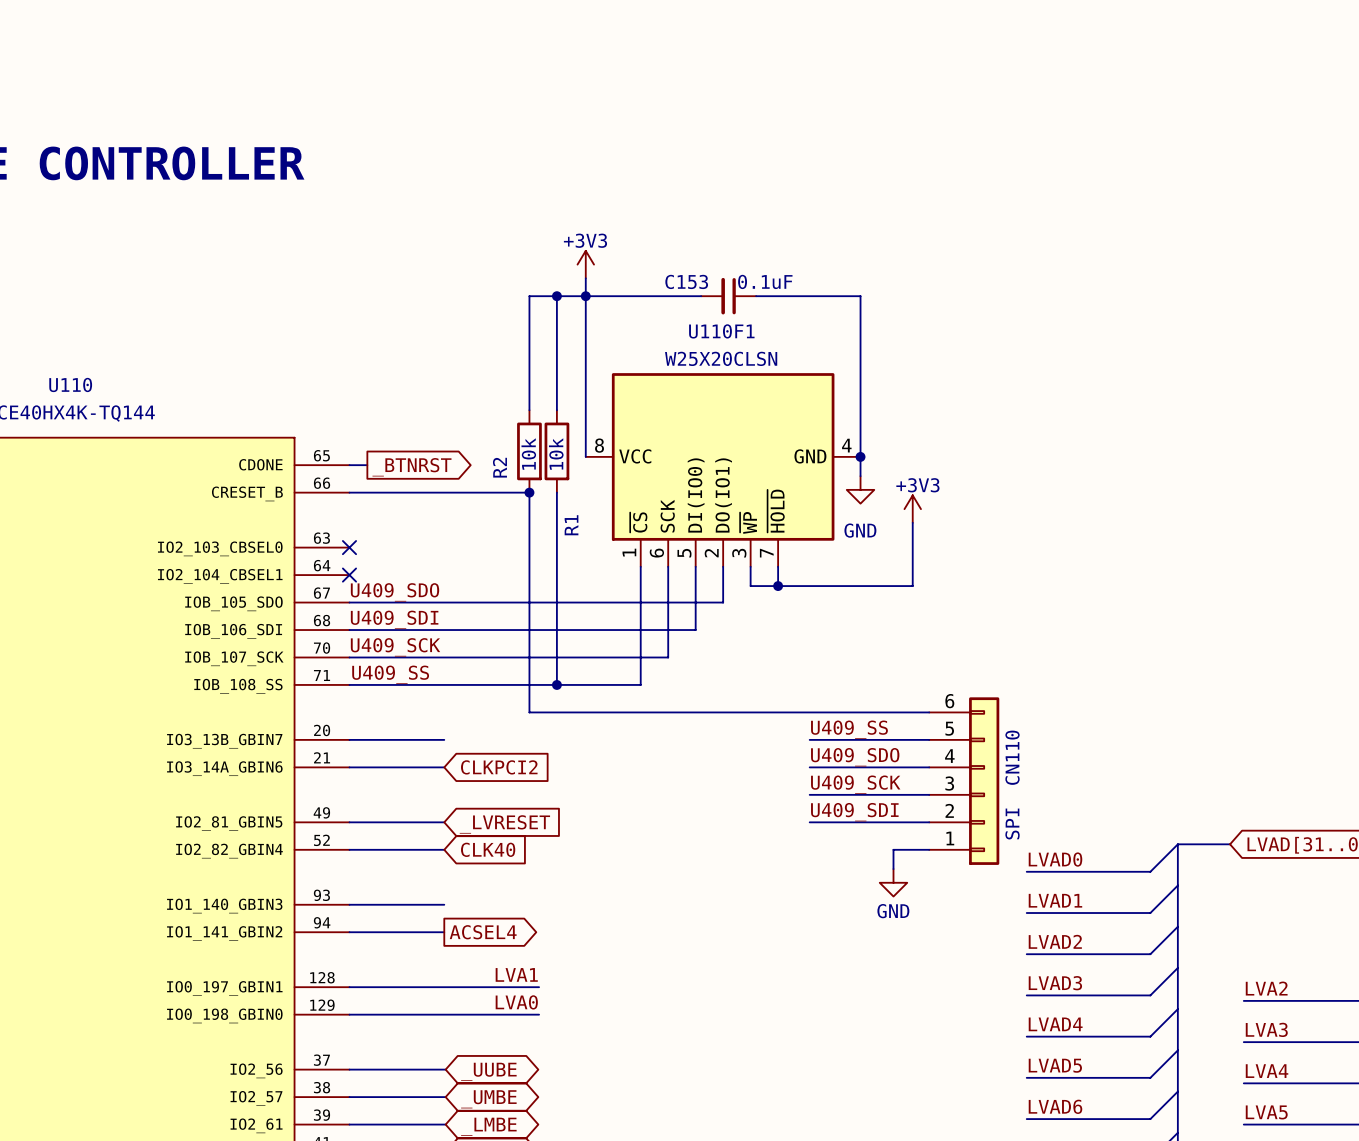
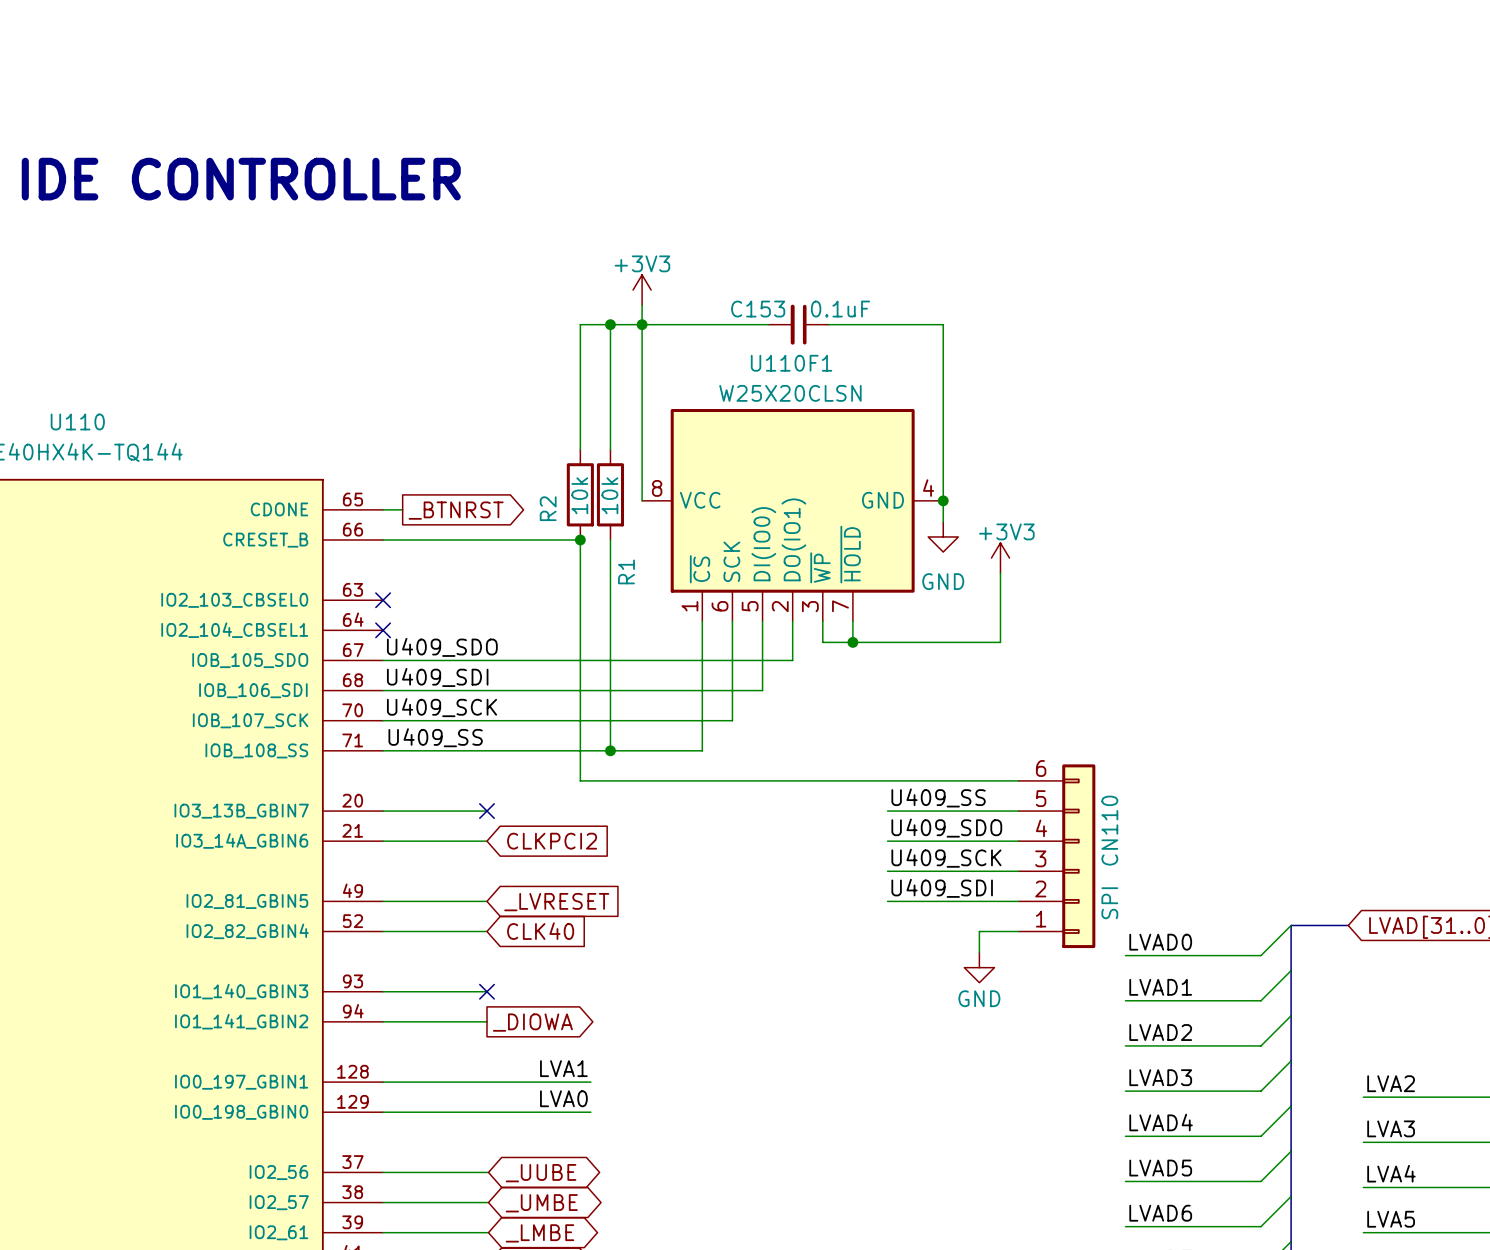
no-connect mark: none -> (486, 811)
no-connect mark: none -> (486, 991)
global label: ACSEL4 (483, 932) -> _DIOWA (532, 1022)

